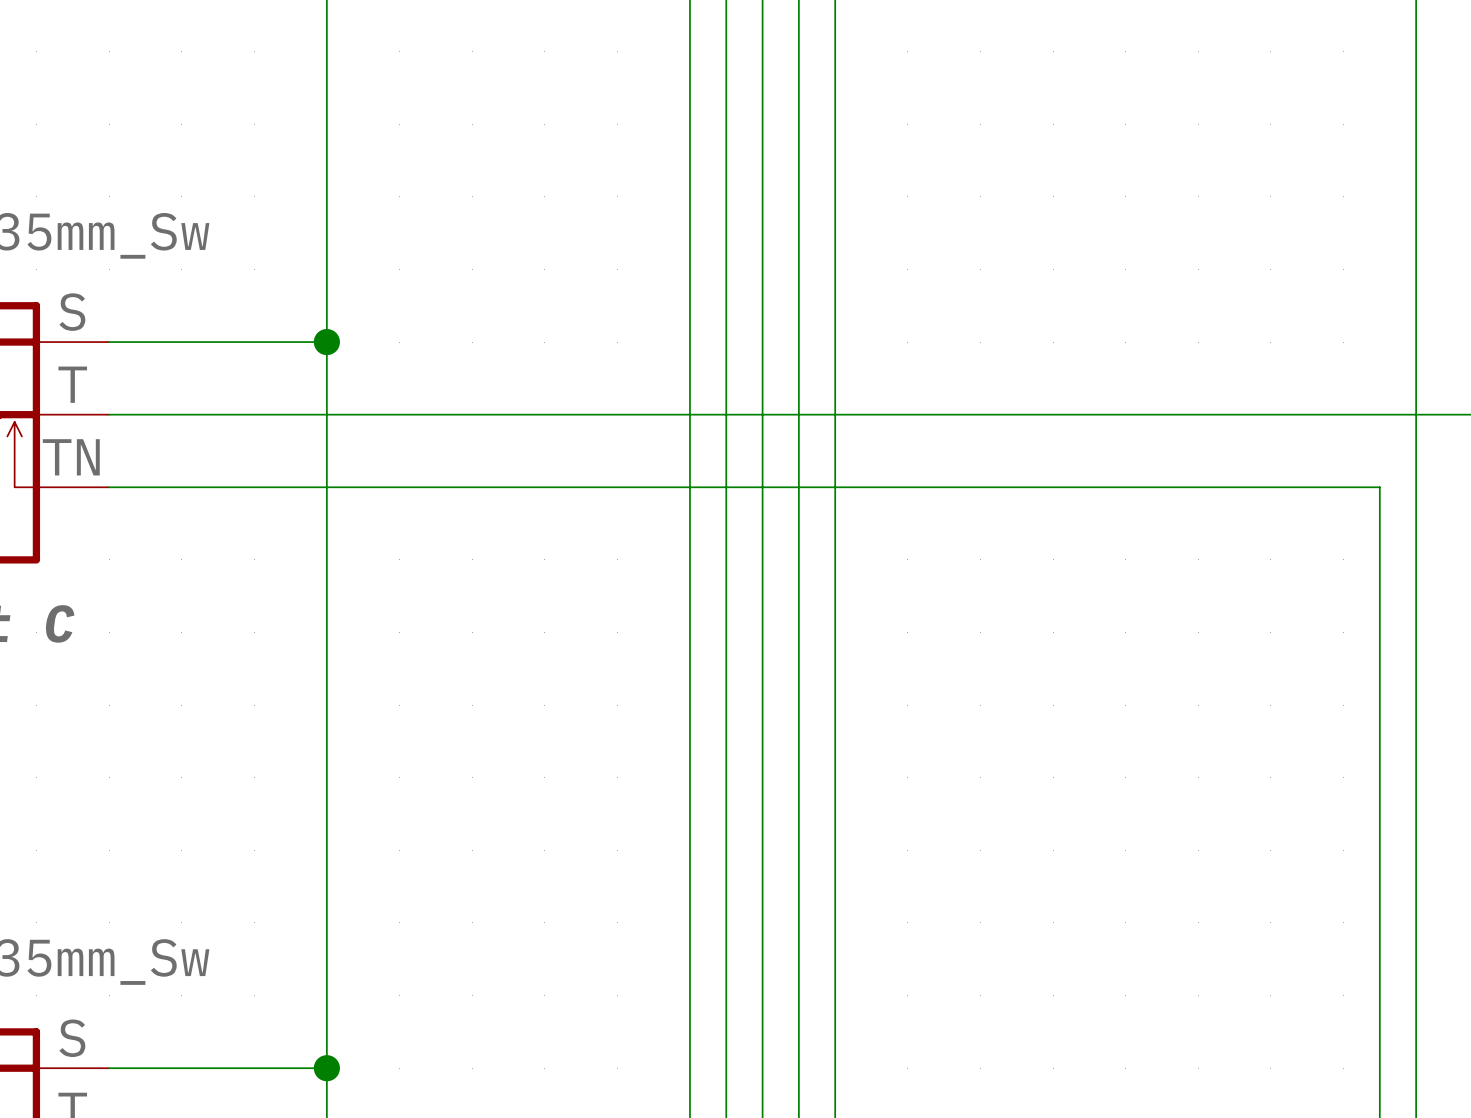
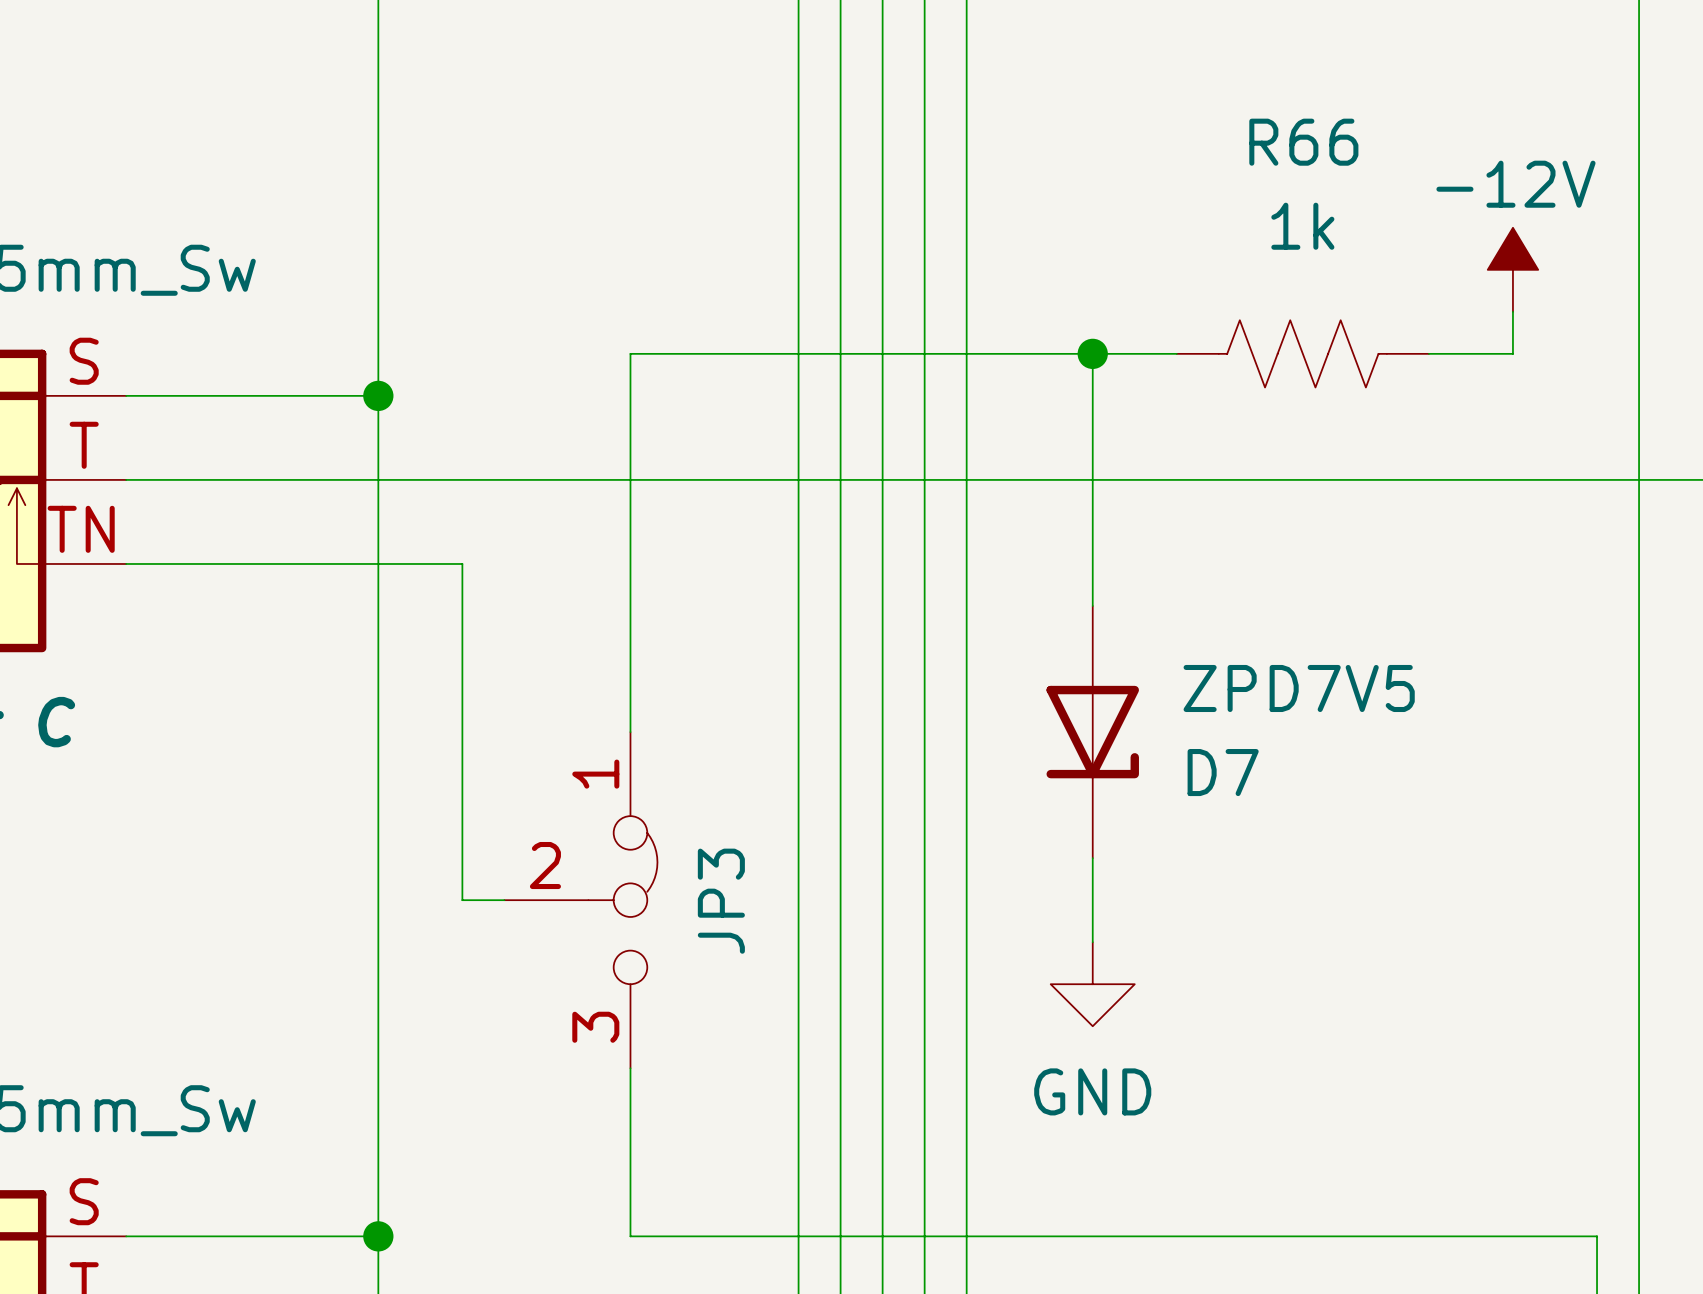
power symbol: none -> -12V (1512, 269)
wire: none -> (1512, 311) (1512, 353) (1428, 353)
wire: none -> (1092, 353) (1092, 606)
junction: none -> (1092, 353)
wire: none -> (1176, 353) (630, 353) (630, 732)
R66: none -> 1k (1302, 353)
wire: (399, 487) (1379, 487) (1379, 1068) -> (630, 1068) (630, 1236) (1597, 1236)
wire: none -> (462, 563) (462, 900) (504, 900)
D7: none -> ZPD7V5 (1092, 732)
wire: none -> (1092, 858) (1092, 942)
JP3: none -> (580, 900)
power symbol: none -> GND (1092, 984)

